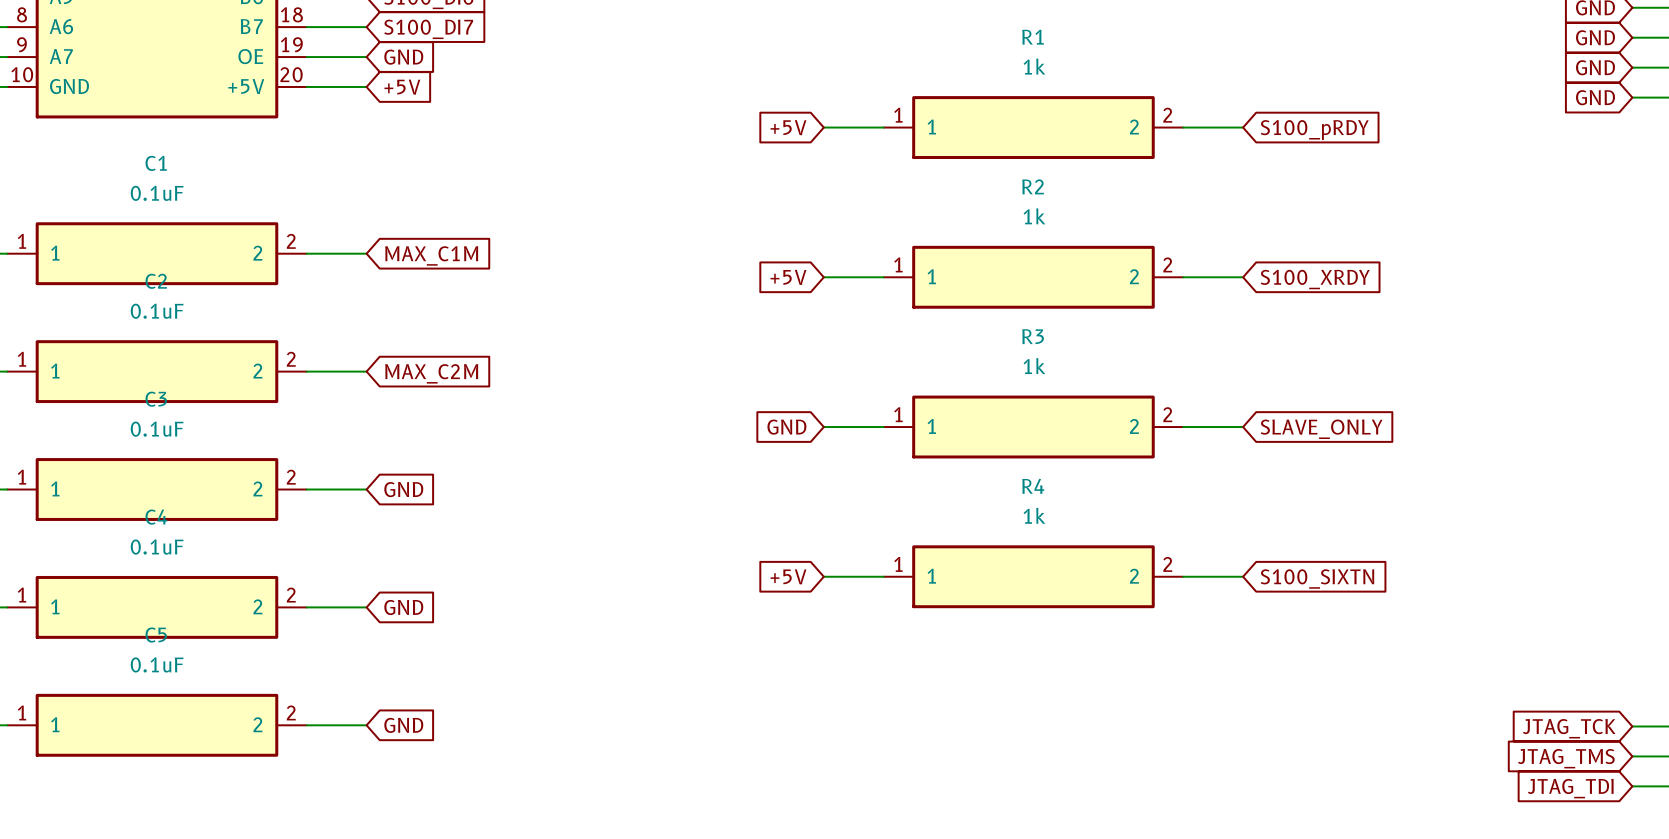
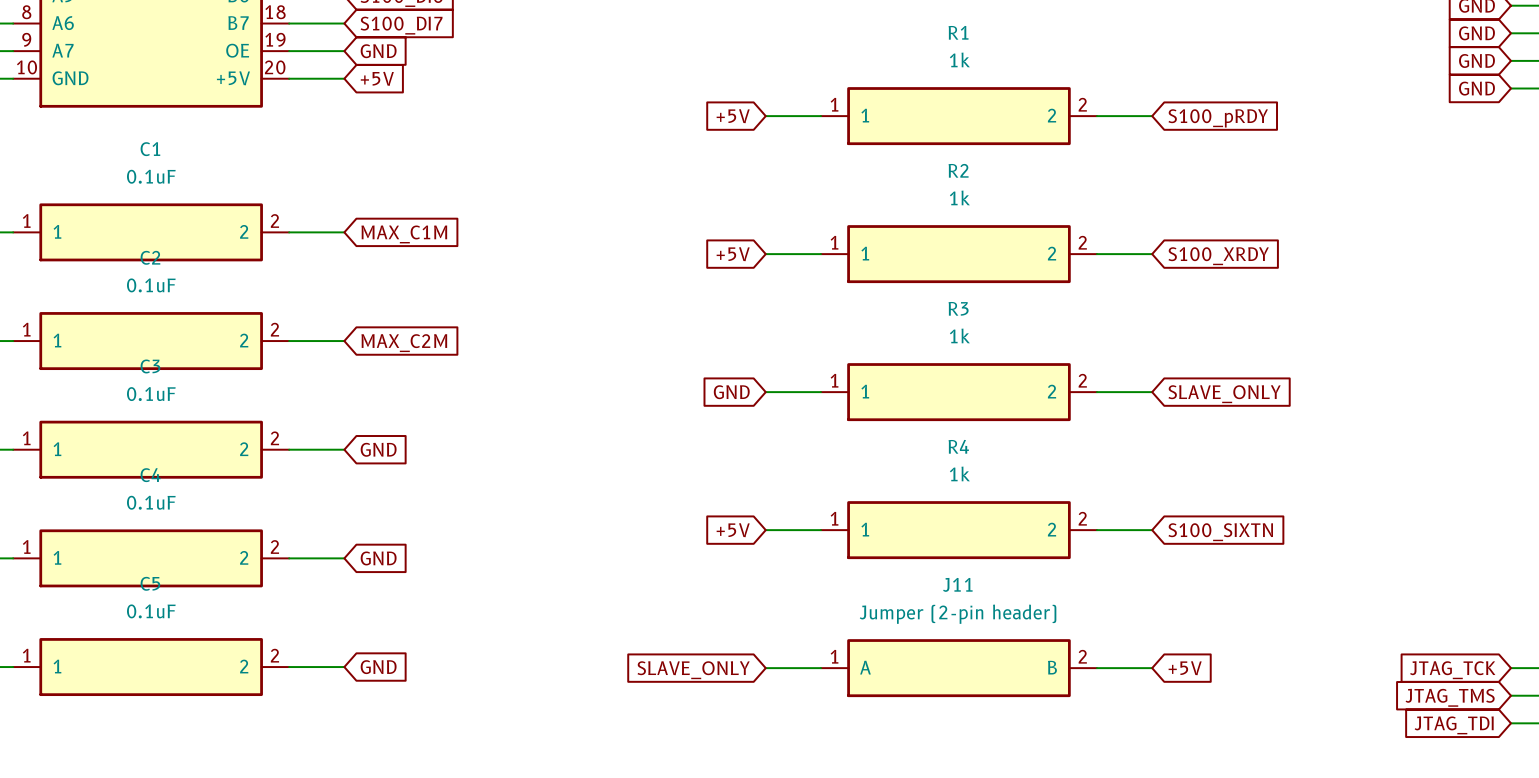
wire: none -> (765, 668) (820, 668)
J11: none -> Jumper (2-pin header) (958, 668)
wire: none -> (1096, 668) (1152, 668)
global label: none -> +5V (1185, 668)
global label: none -> SLAVE_ONLY (693, 670)

